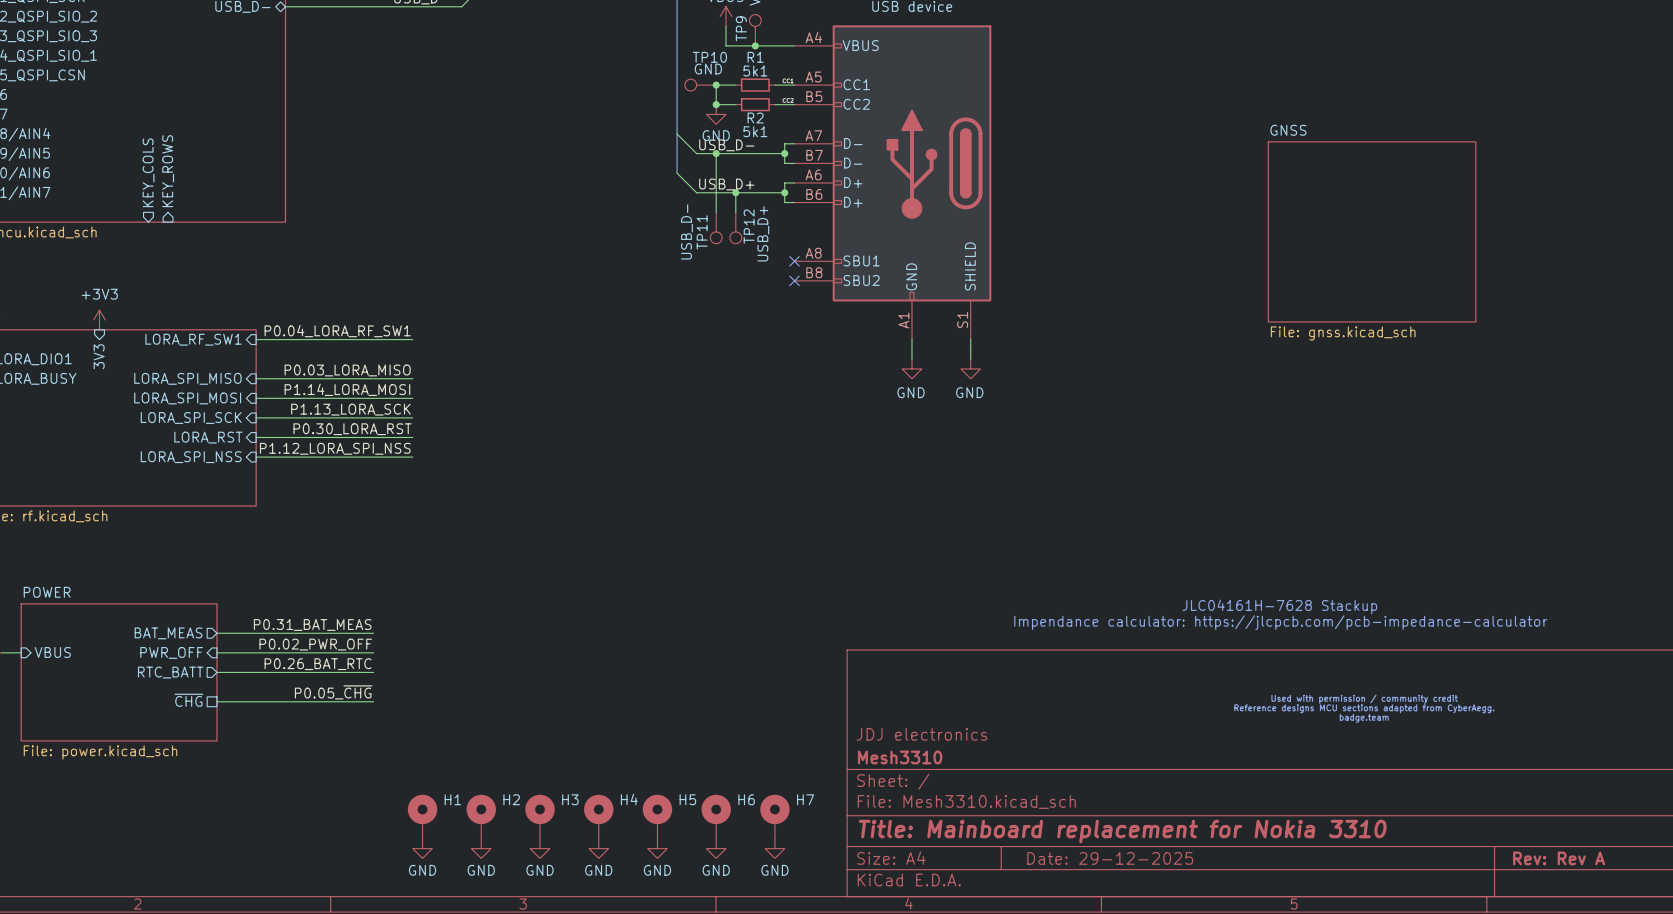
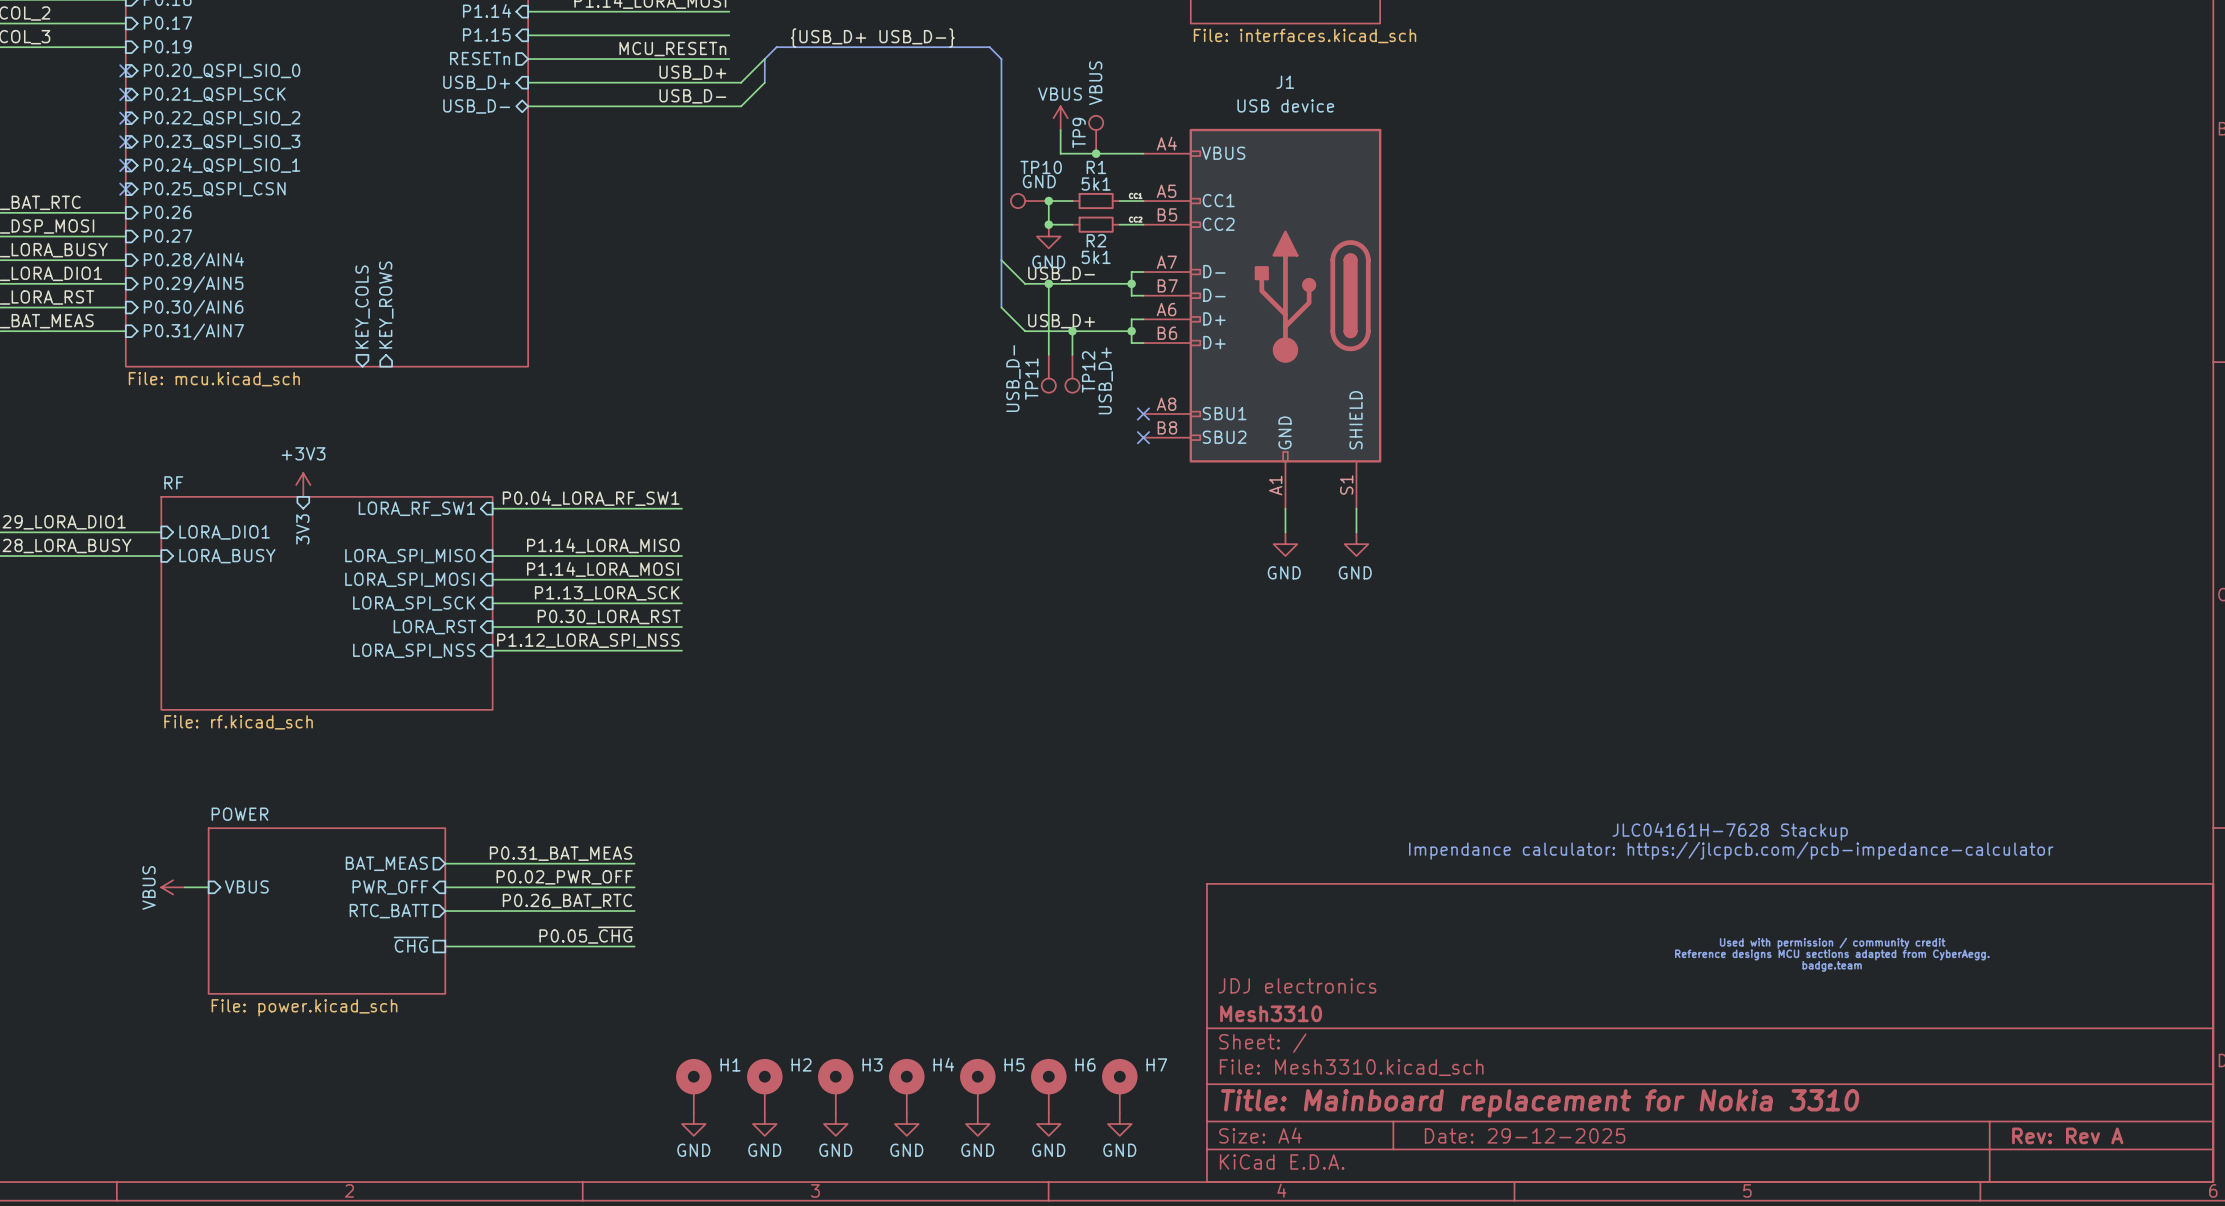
sheet GNSS: File: gnss.kicad_sch (1372, 231) -> none
label: P0.03_LORA_MISO (347, 370) -> P1.14_LORA_MISO (603, 545)

